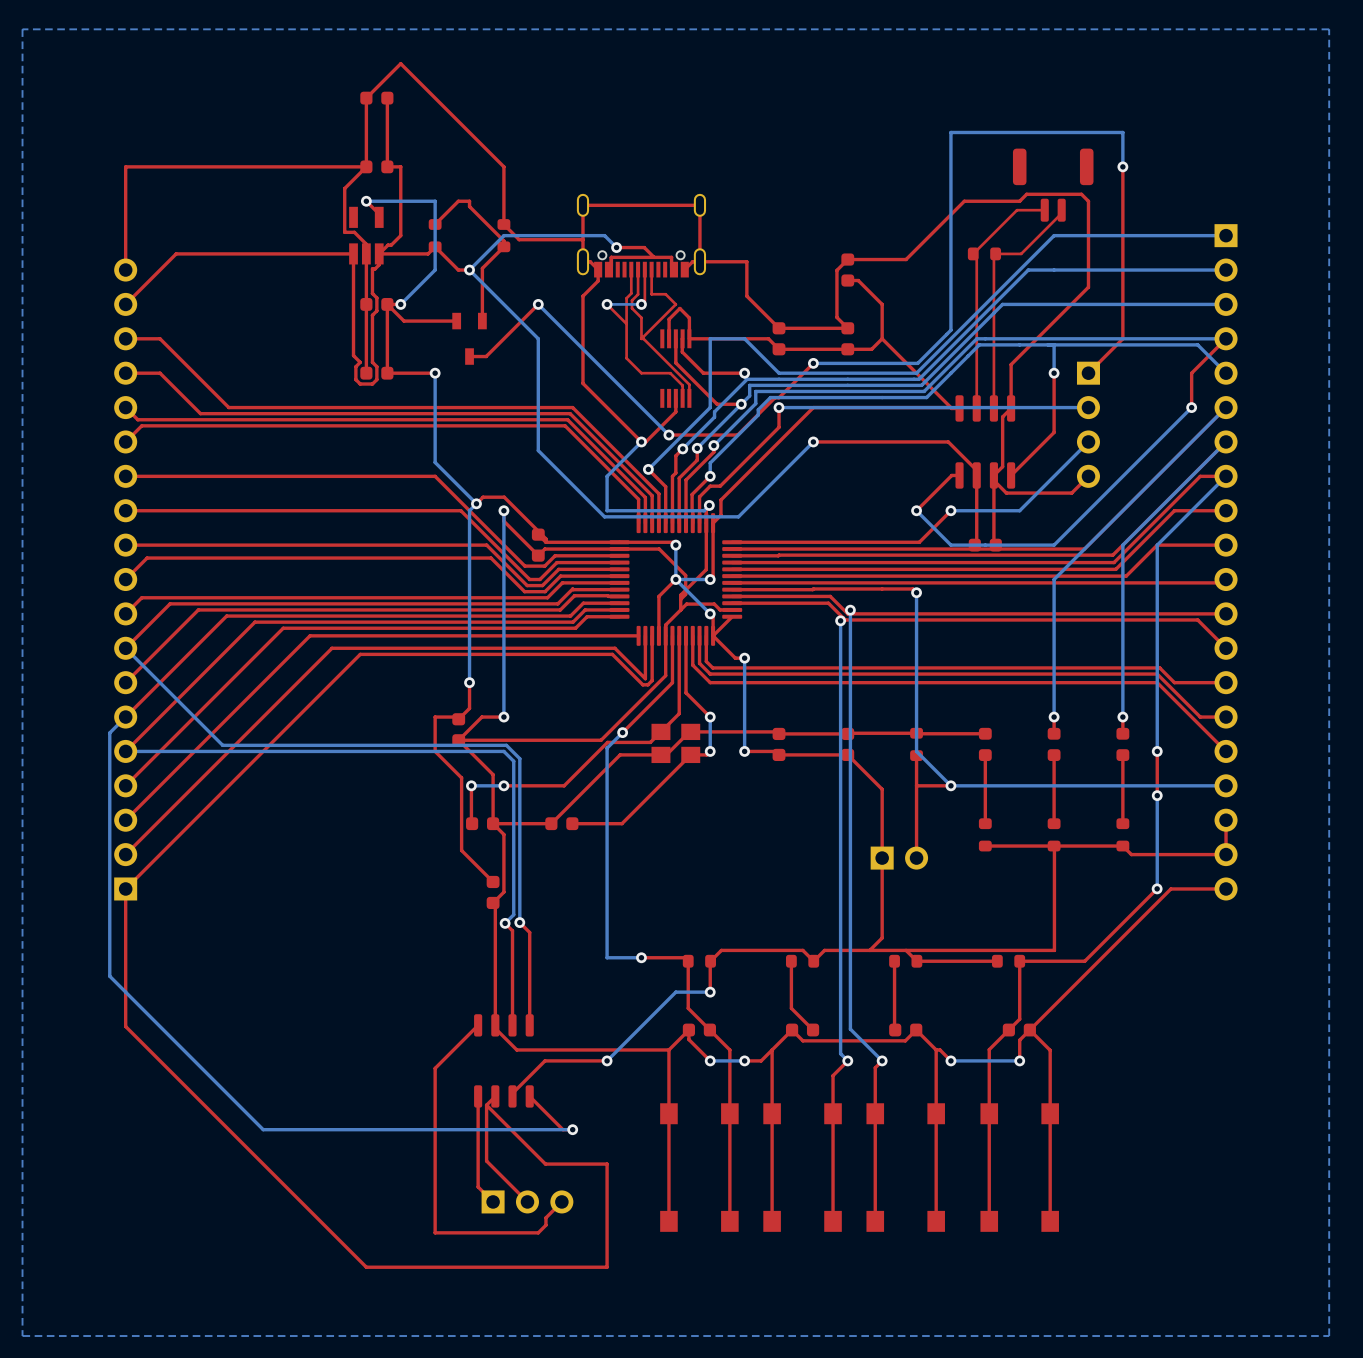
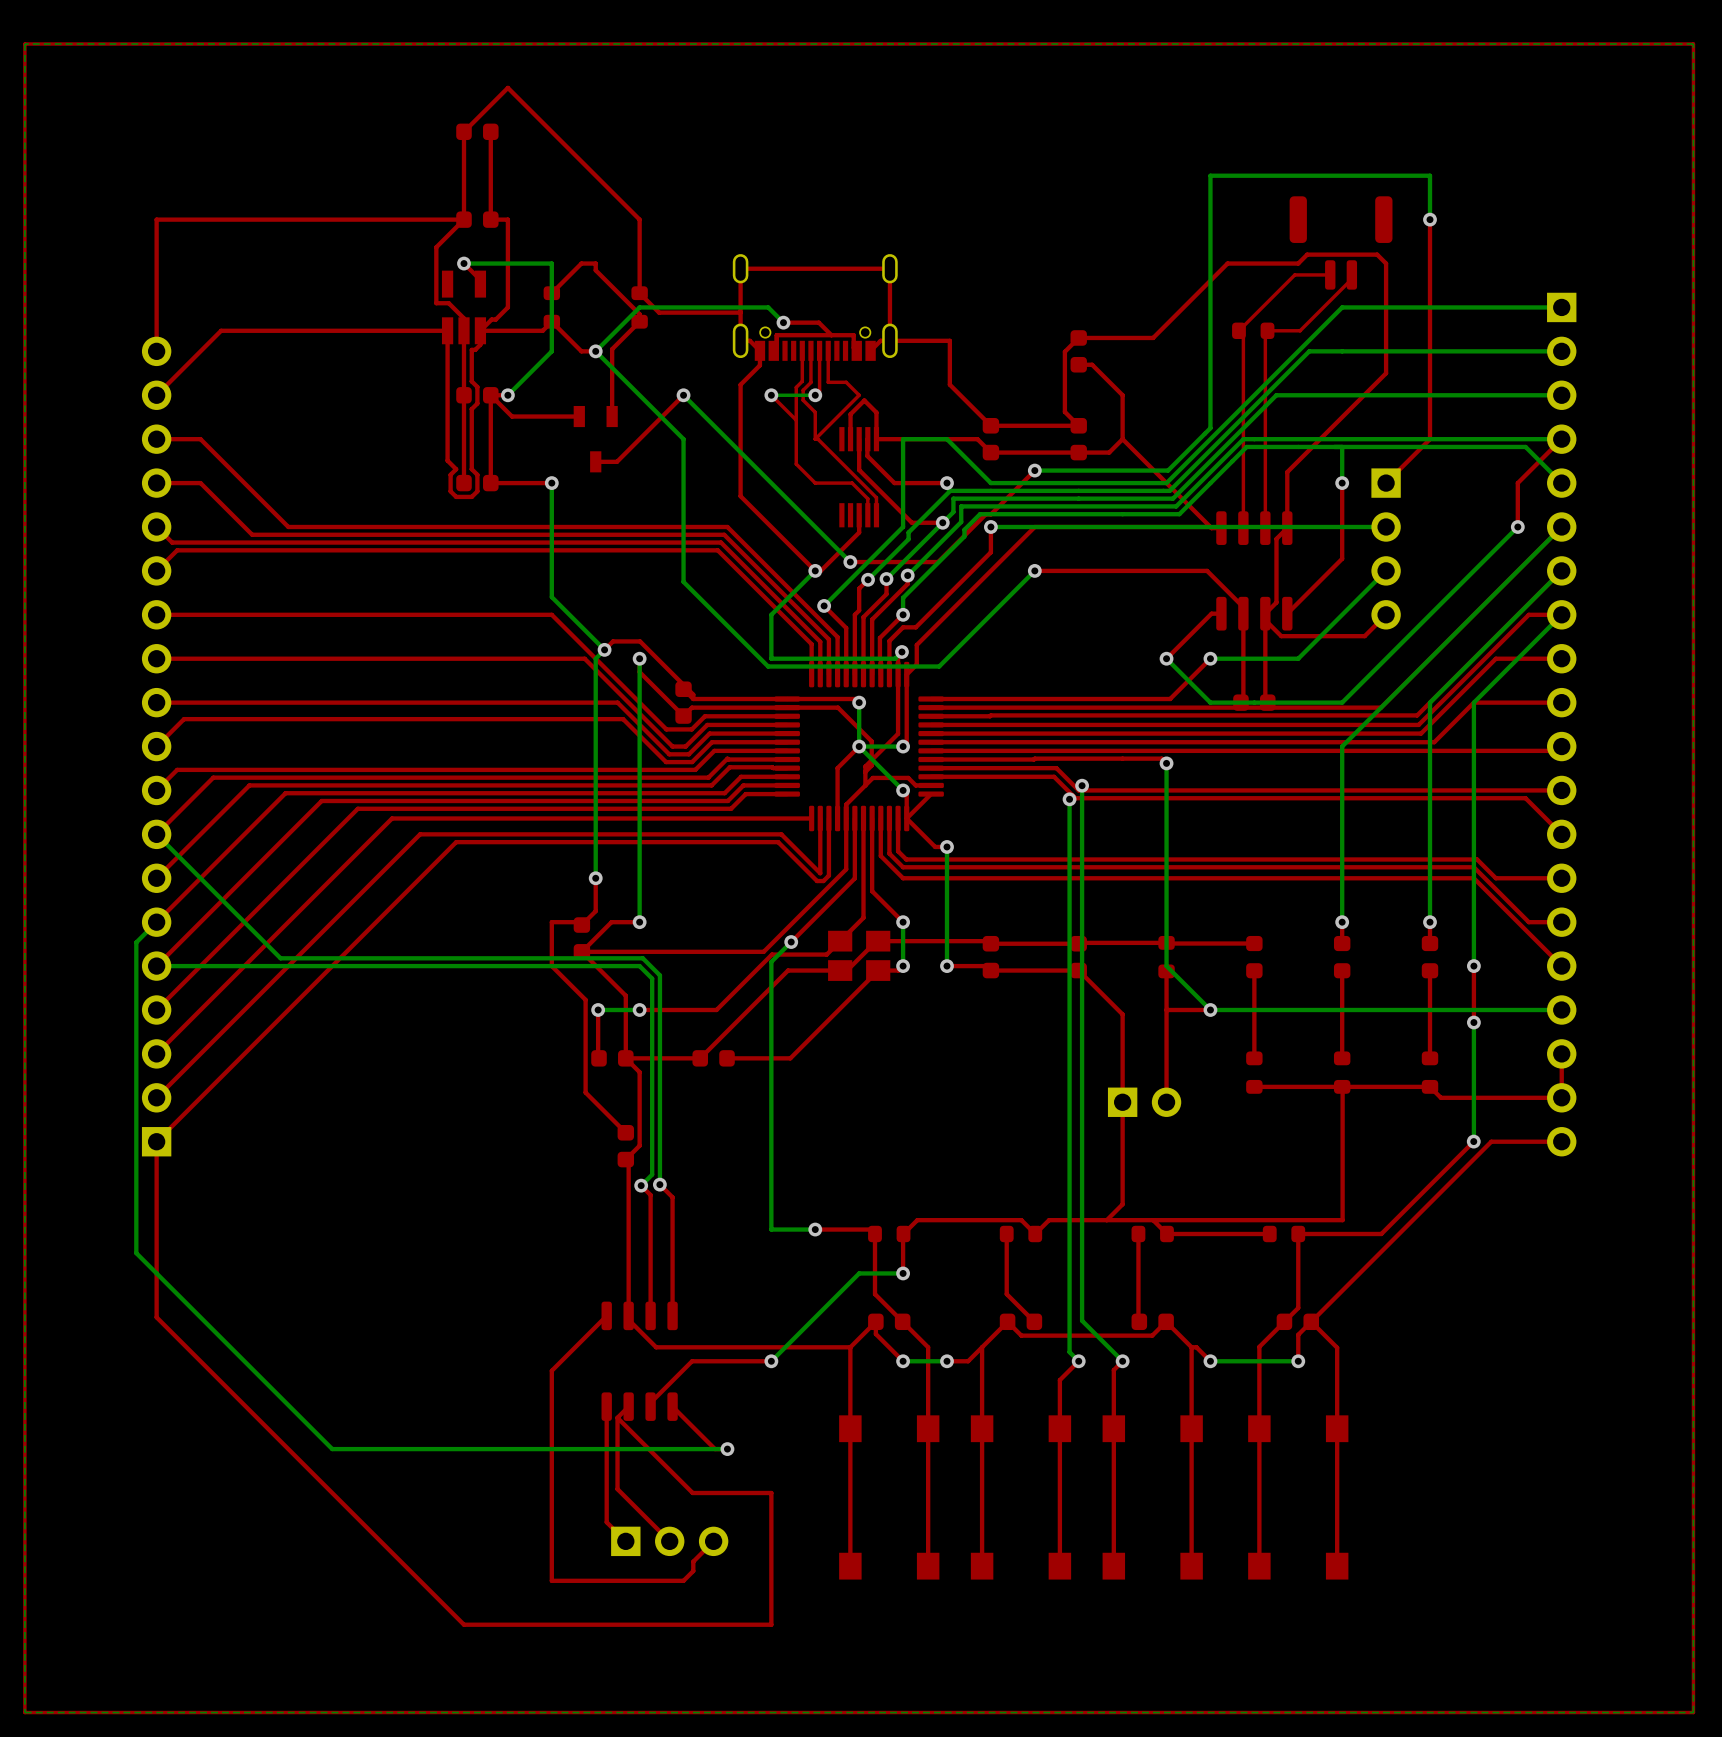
top track: none -> (1693, 43) (24, 43) (24, 1712) (1693, 1712) (1693, 43)

